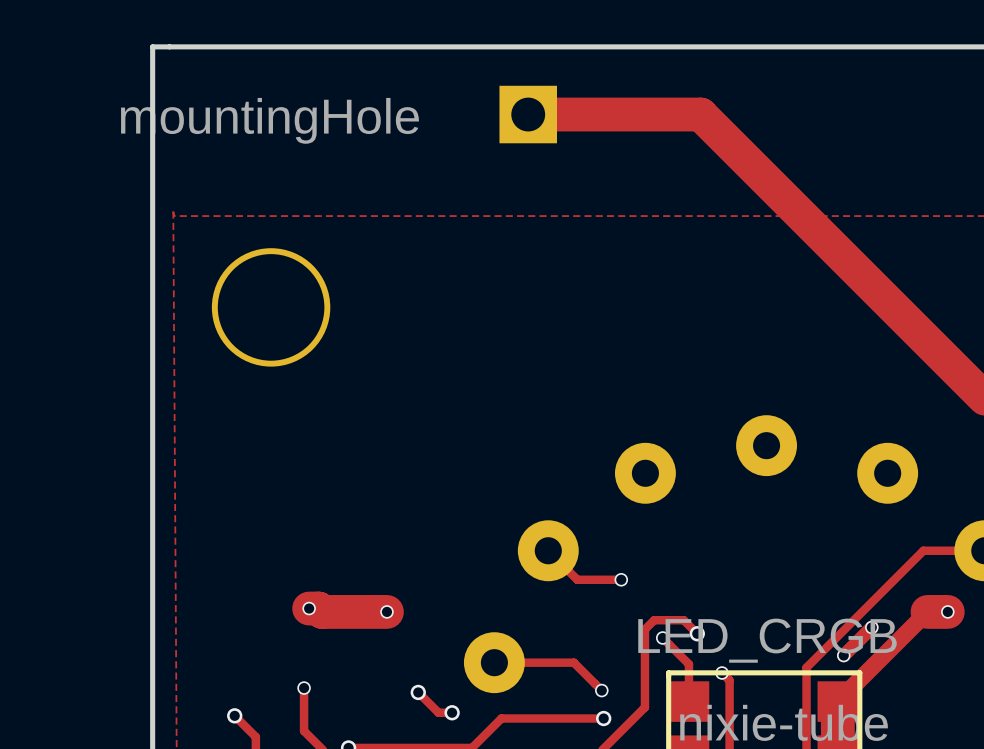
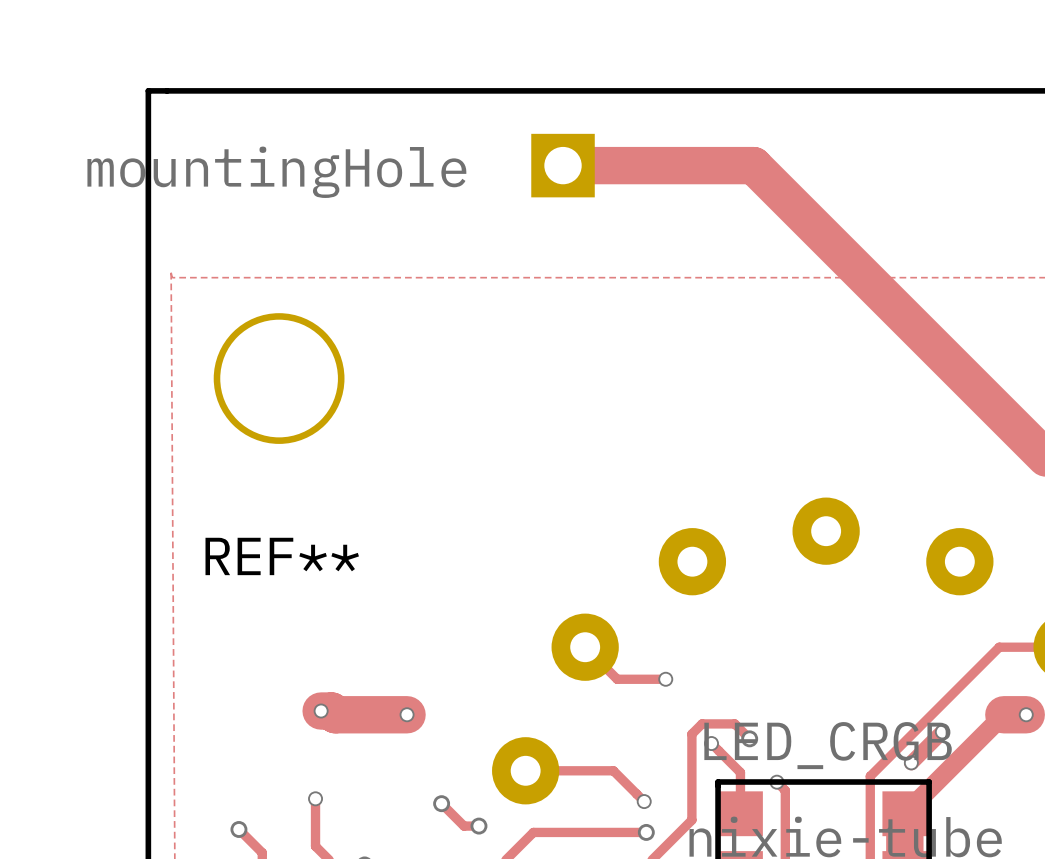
REF** name: none -> REF** (282, 556)

